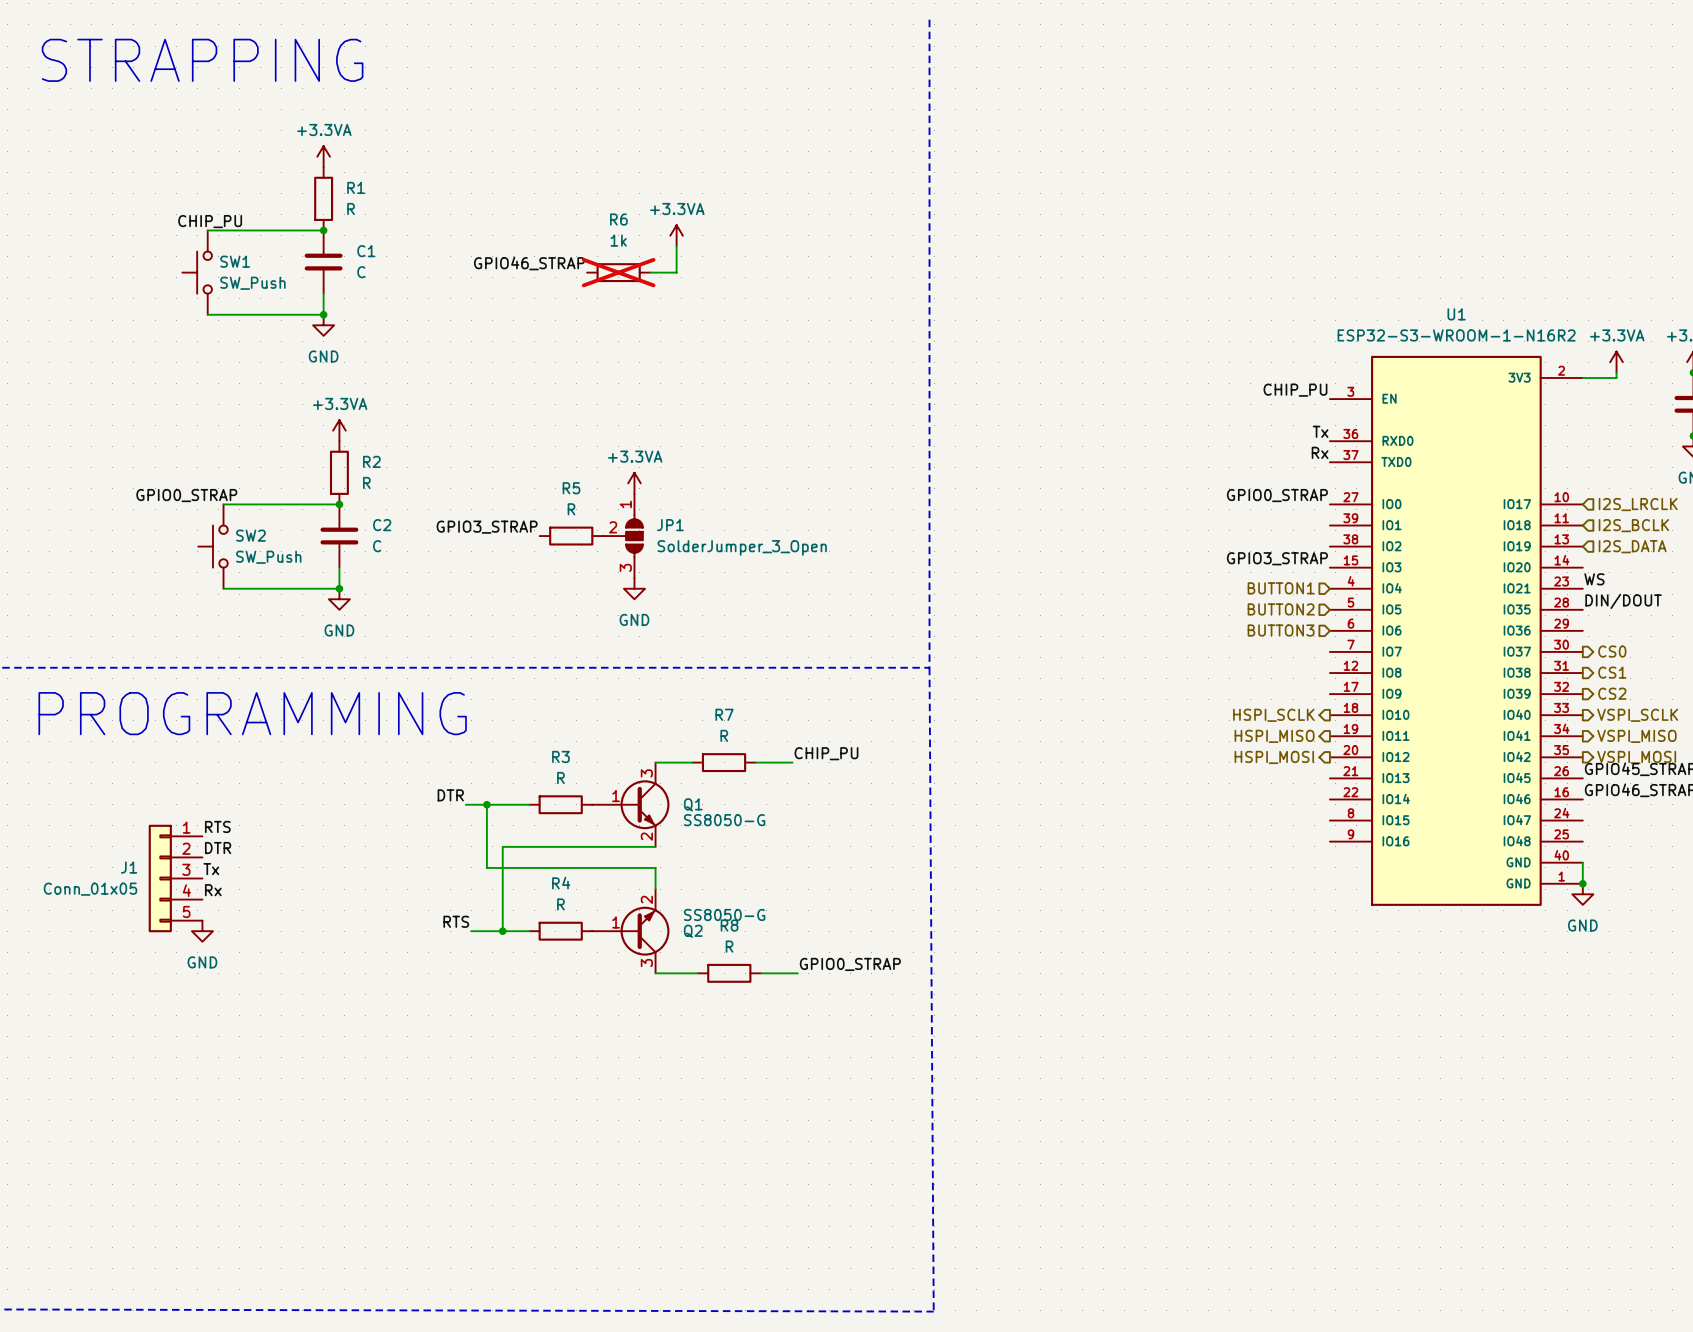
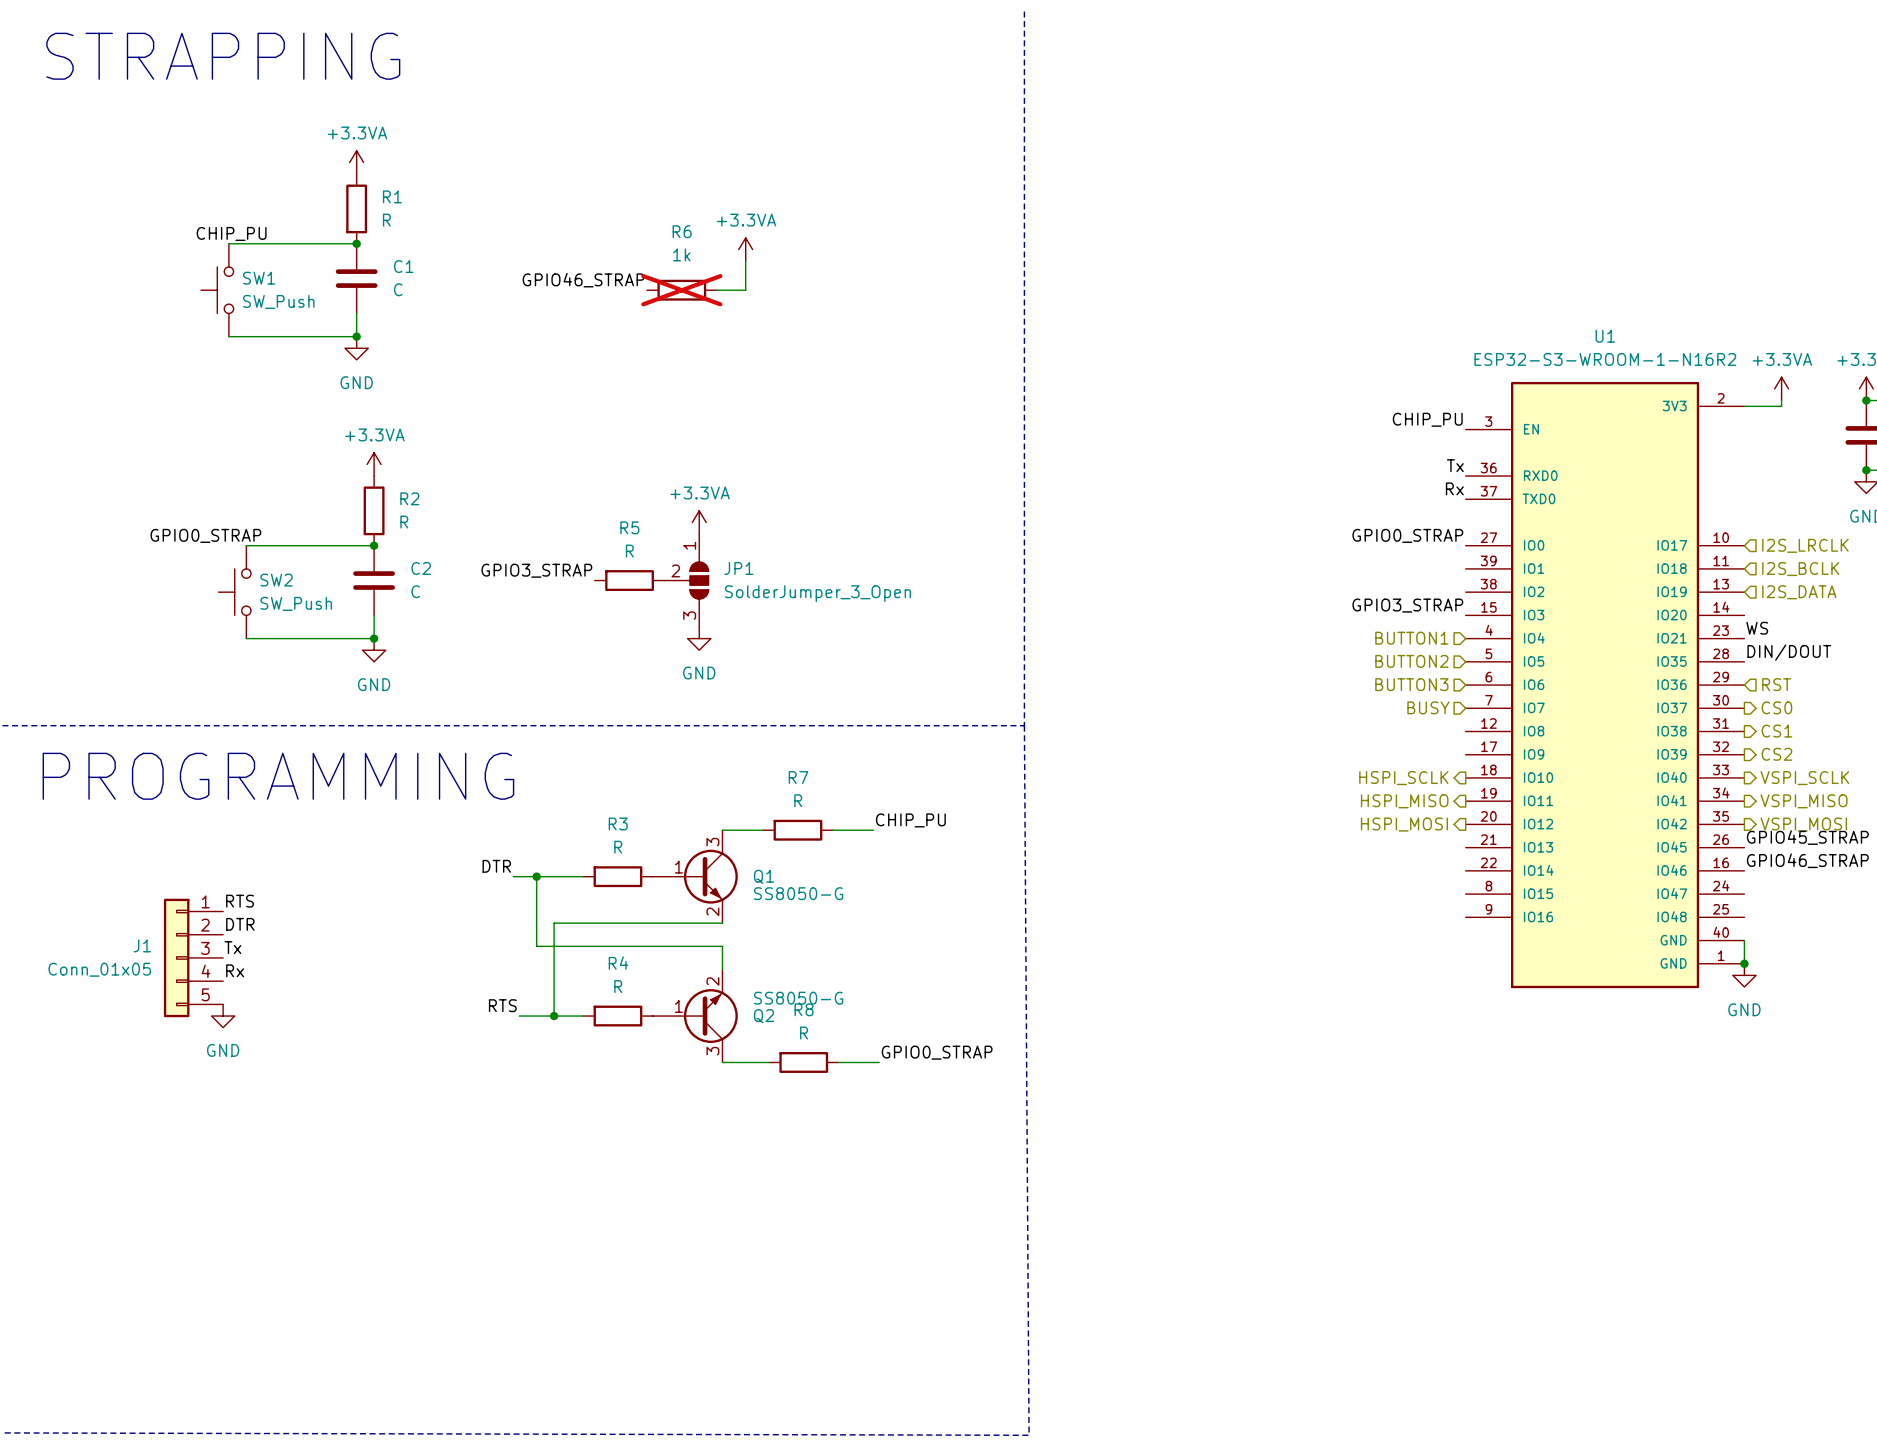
hierarchical label: none -> RST (1776, 684)
hierarchical label: none -> BUSY (1428, 707)

